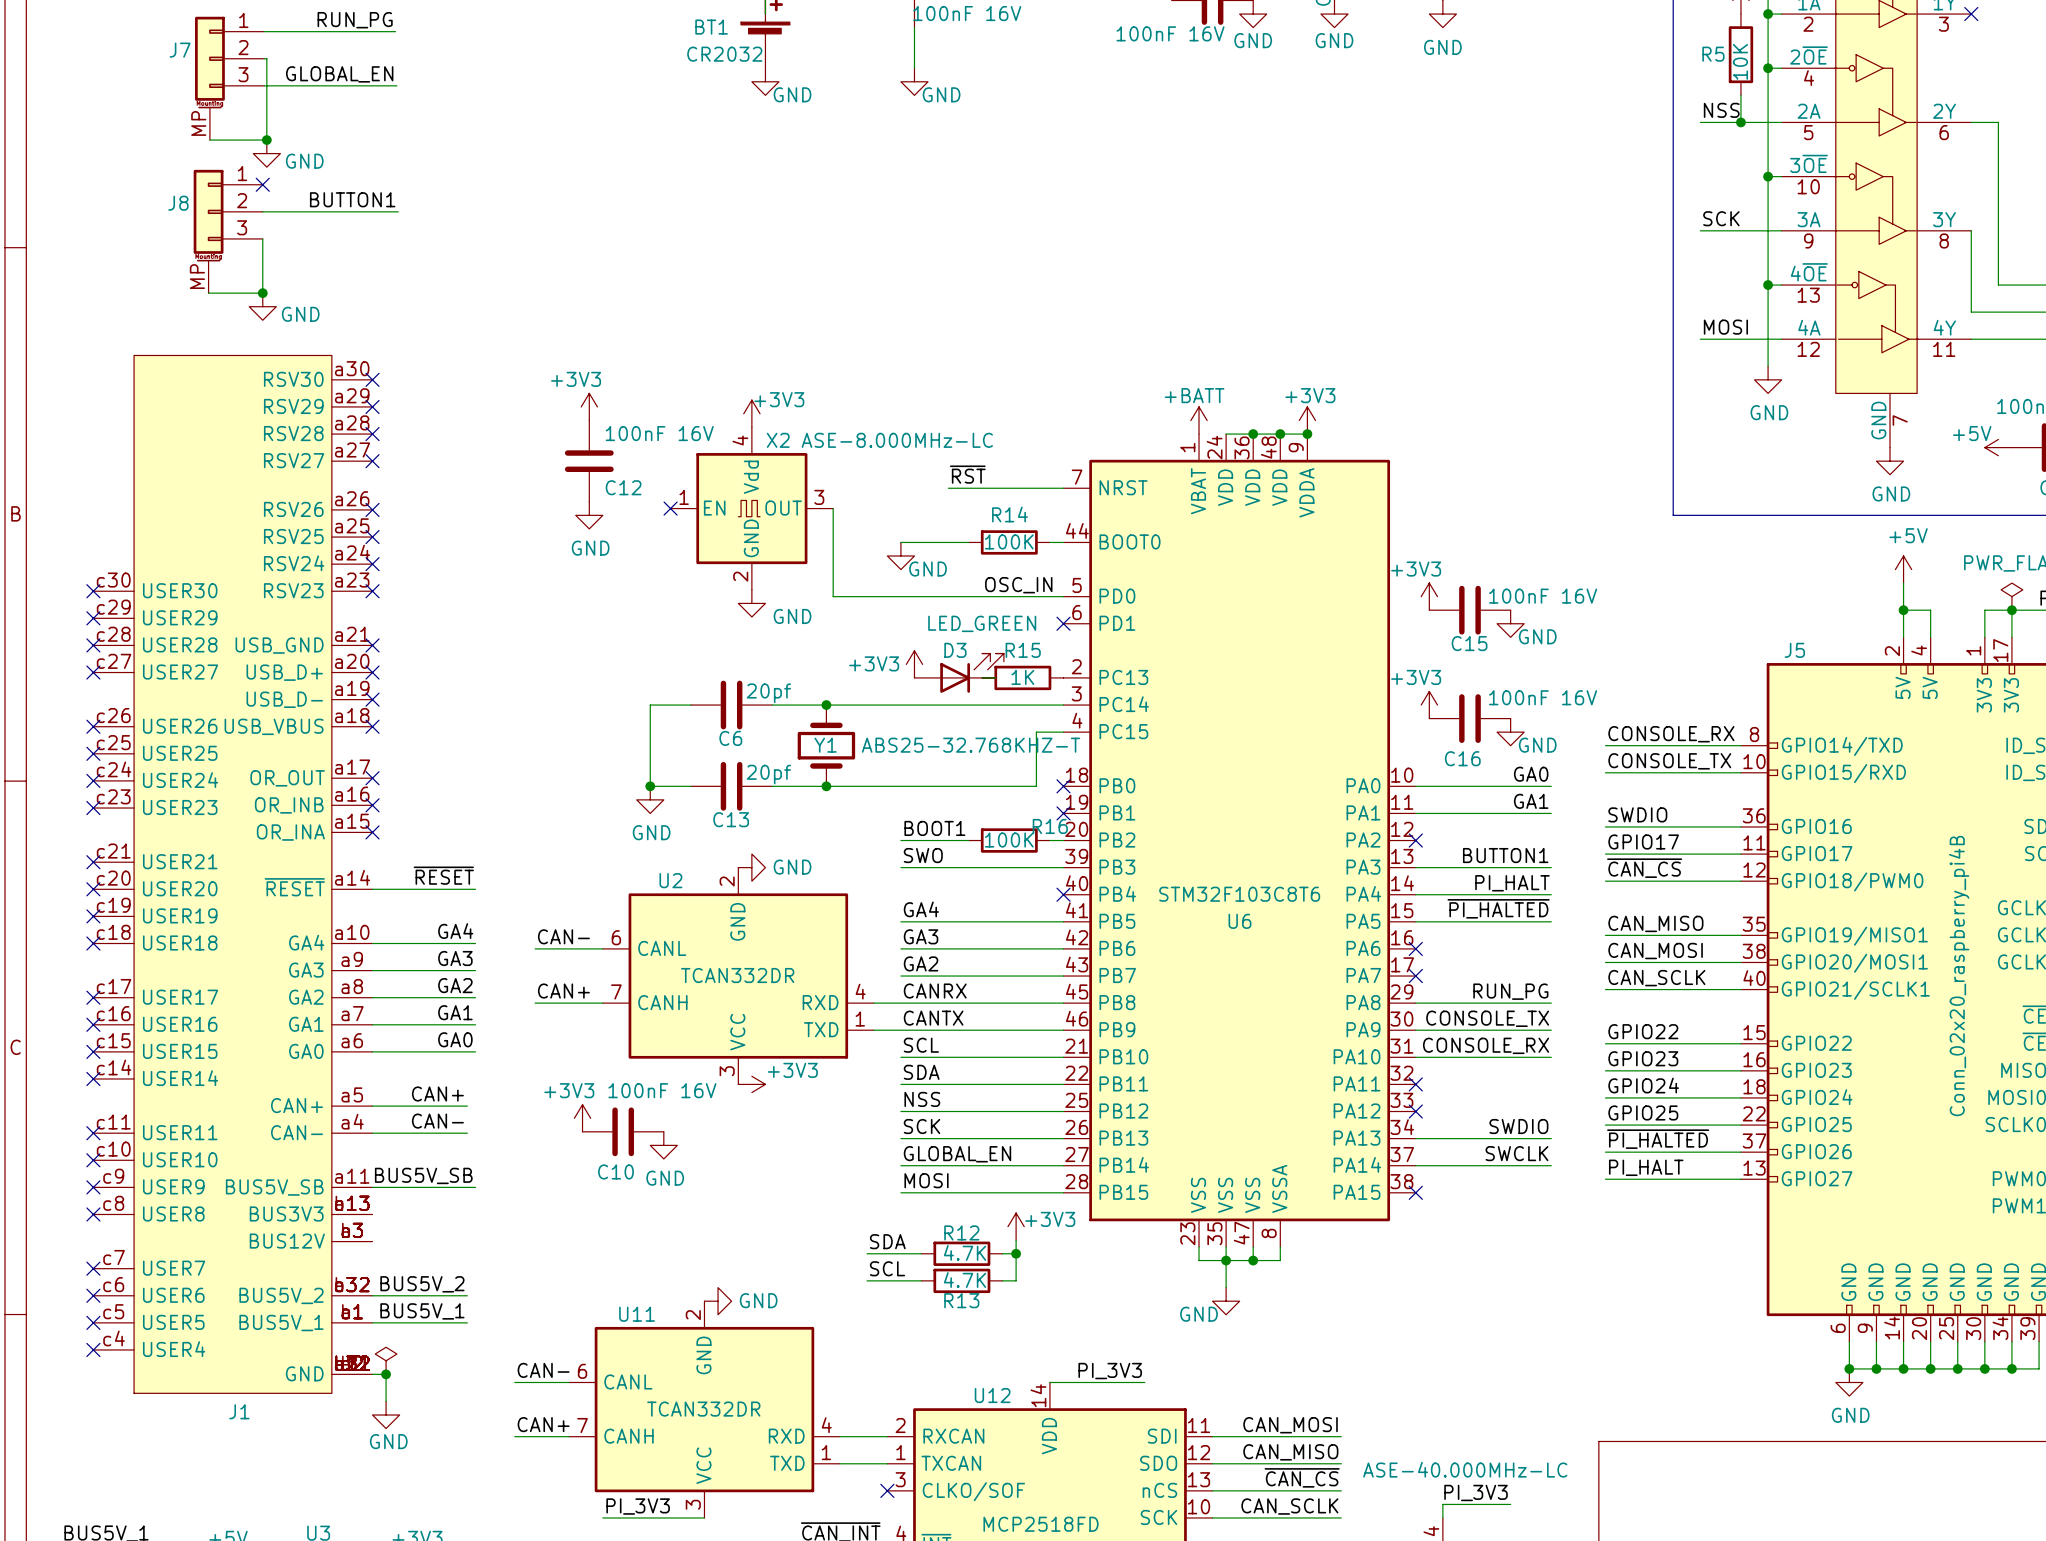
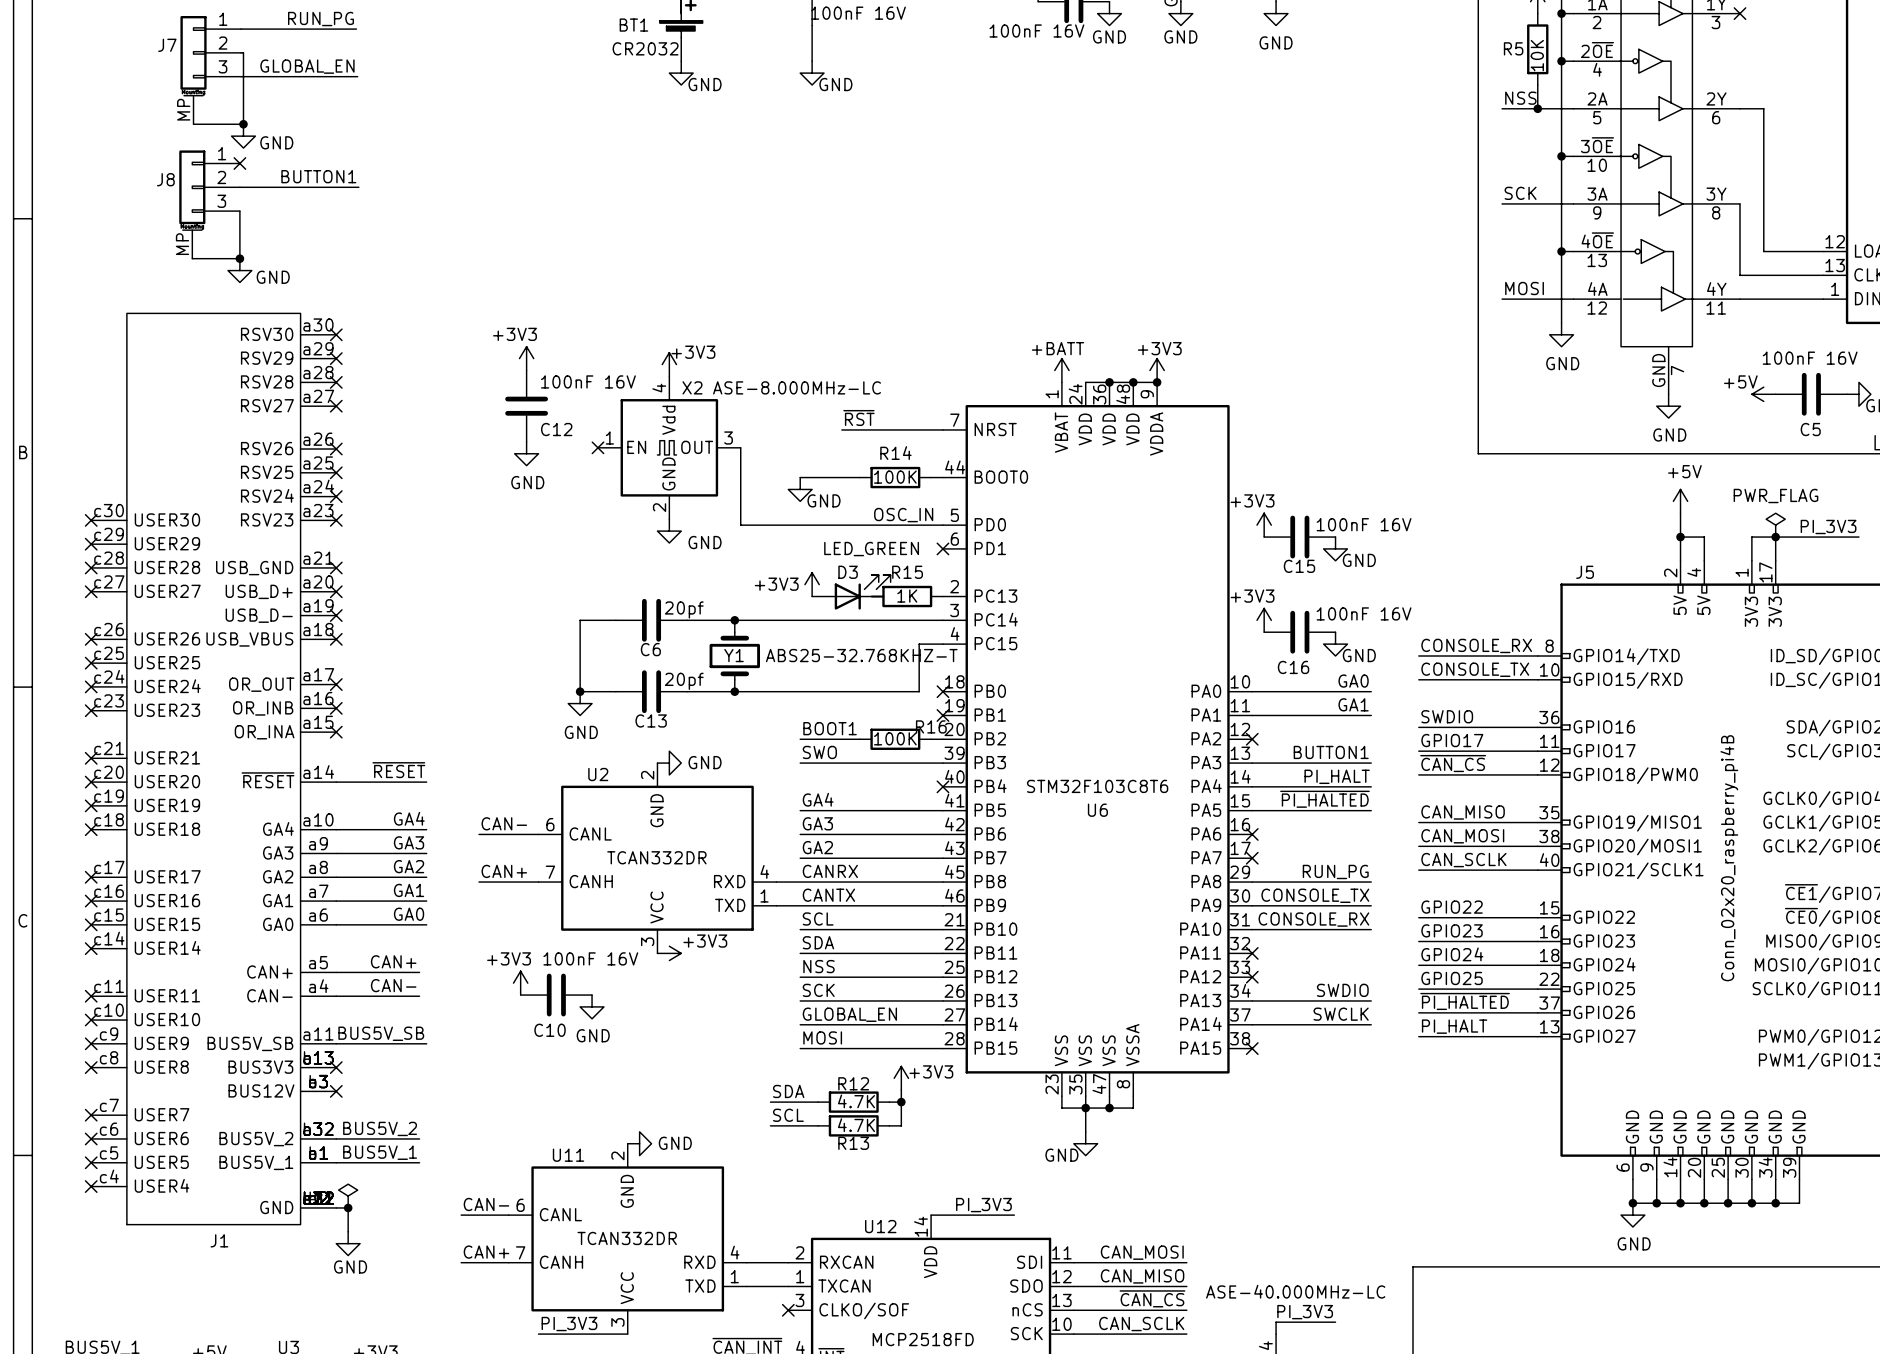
no-connect mark: none -> (336, 1067)
no-connect mark: none -> (336, 1091)

